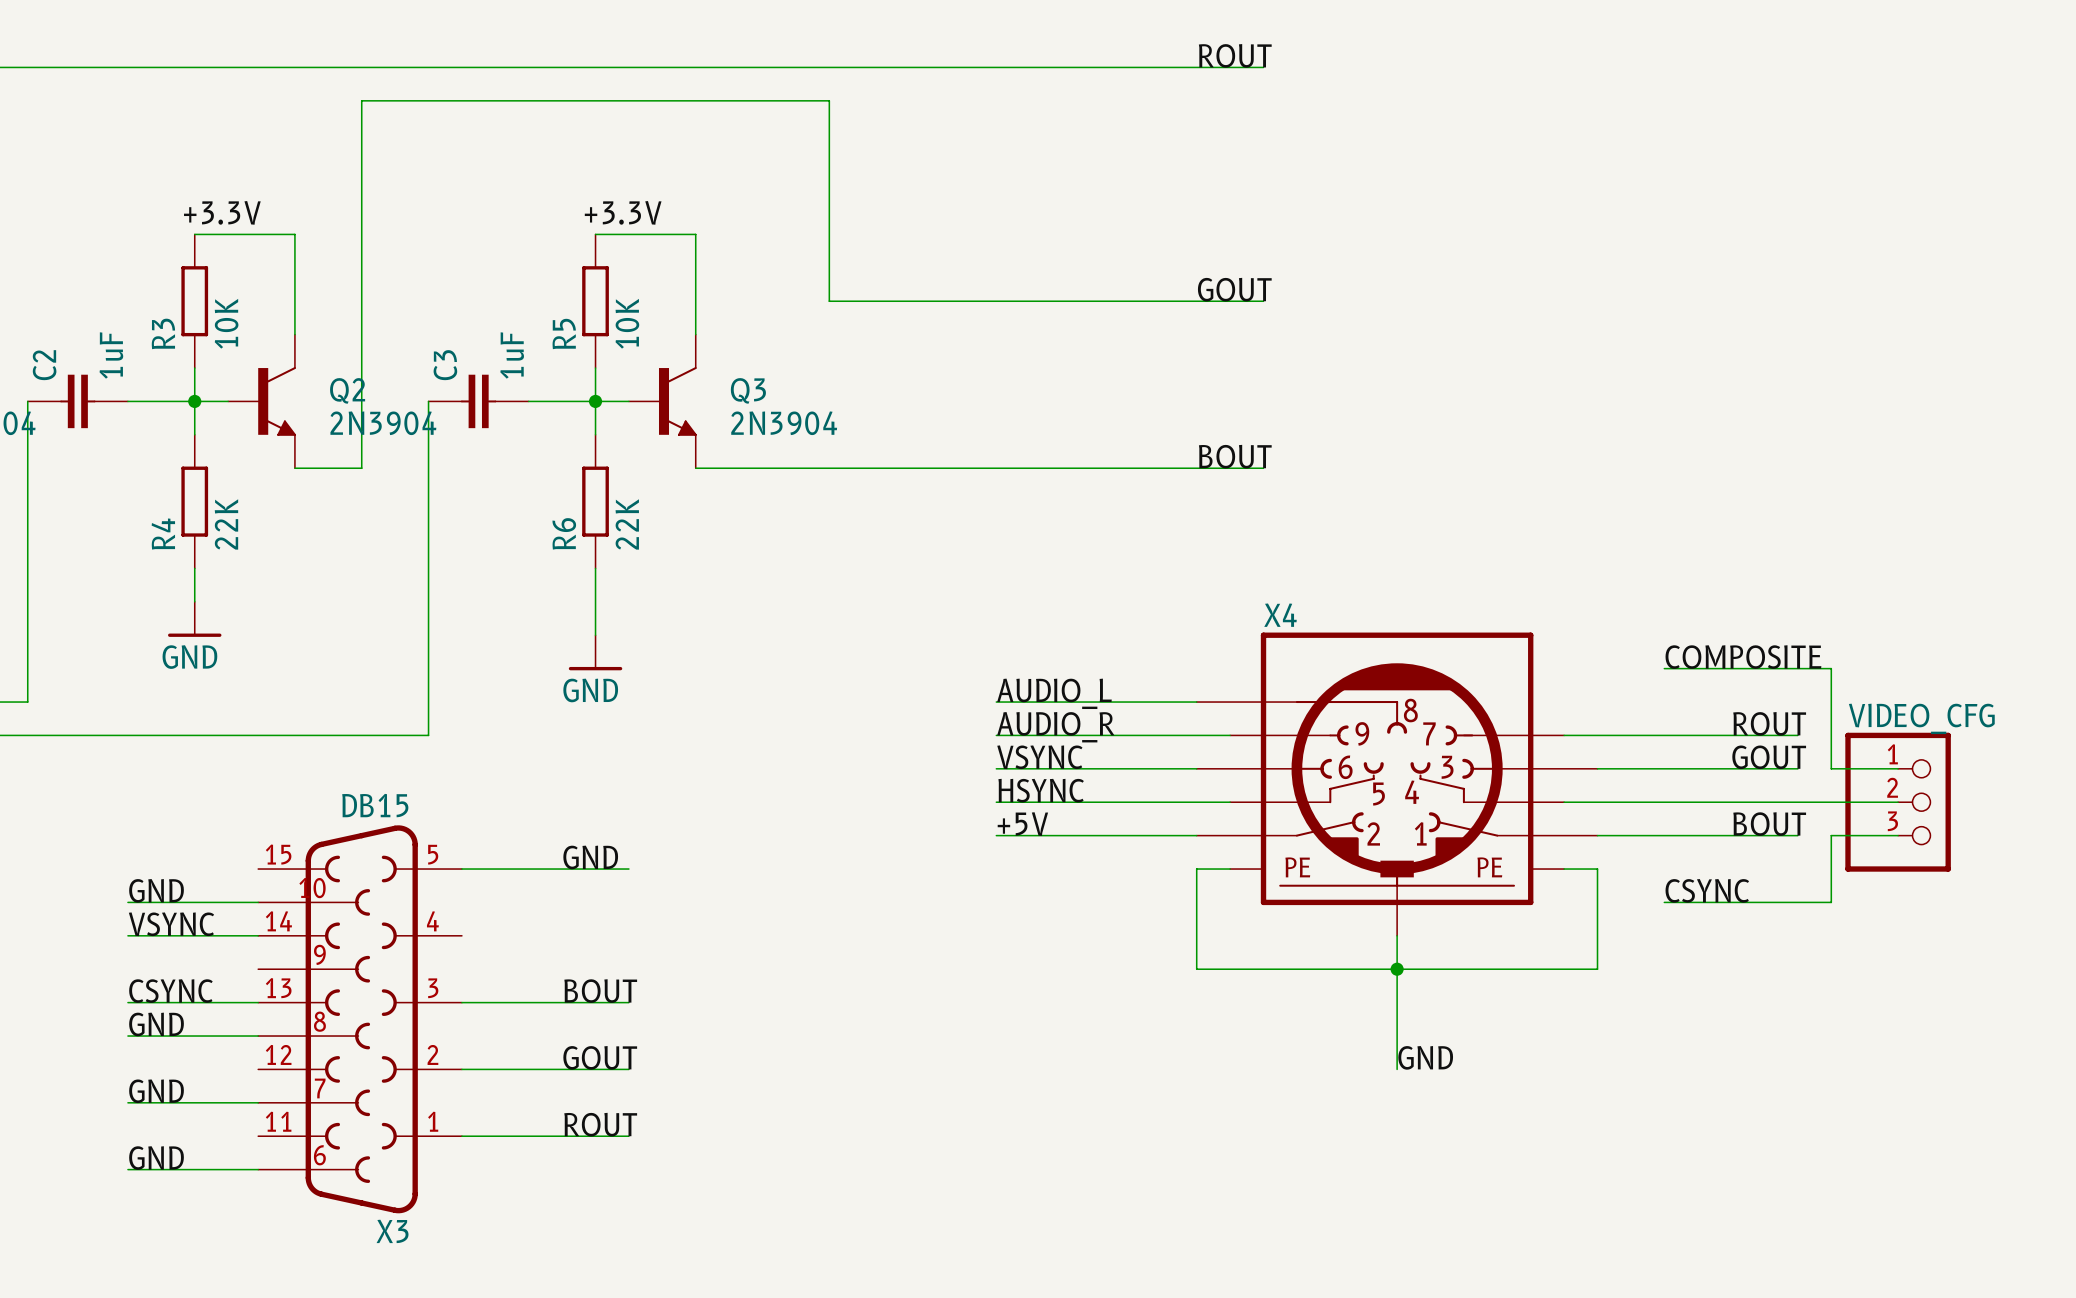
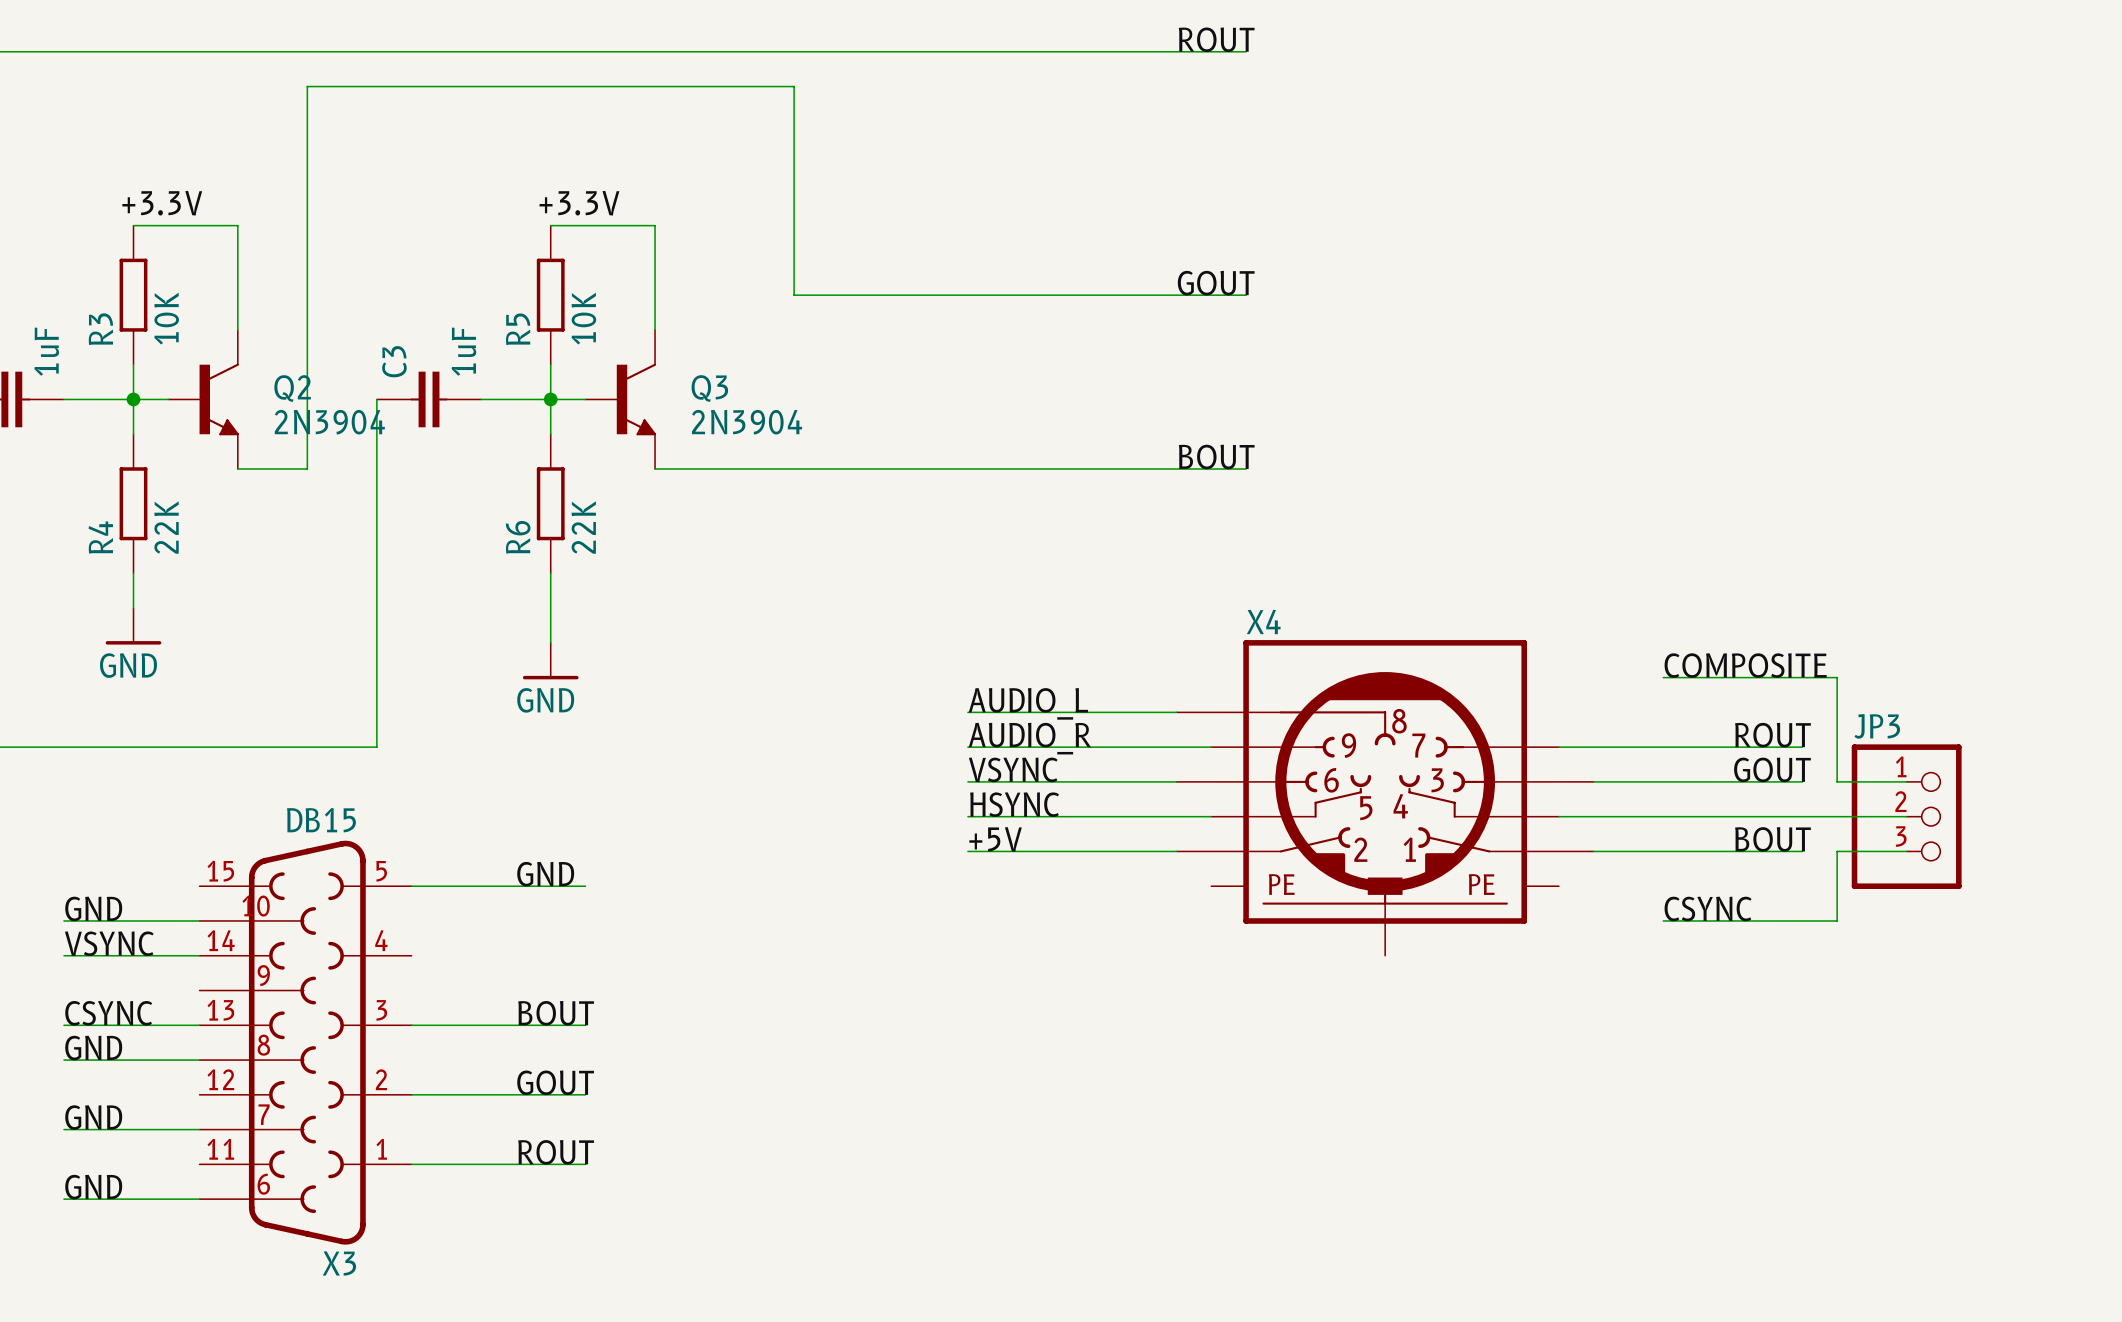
VIDEO_CFG name: VIDEO_CFG (1921, 718) -> JP3 (1877, 726)
wire: (1230, 869) (1196, 869) (1196, 969) (1597, 969) (1597, 869) (1564, 869) -> none
wire: (1397, 935) (1397, 1069) -> none
junction: (1397, 969) -> none
label: GND (1425, 1057) -> none

